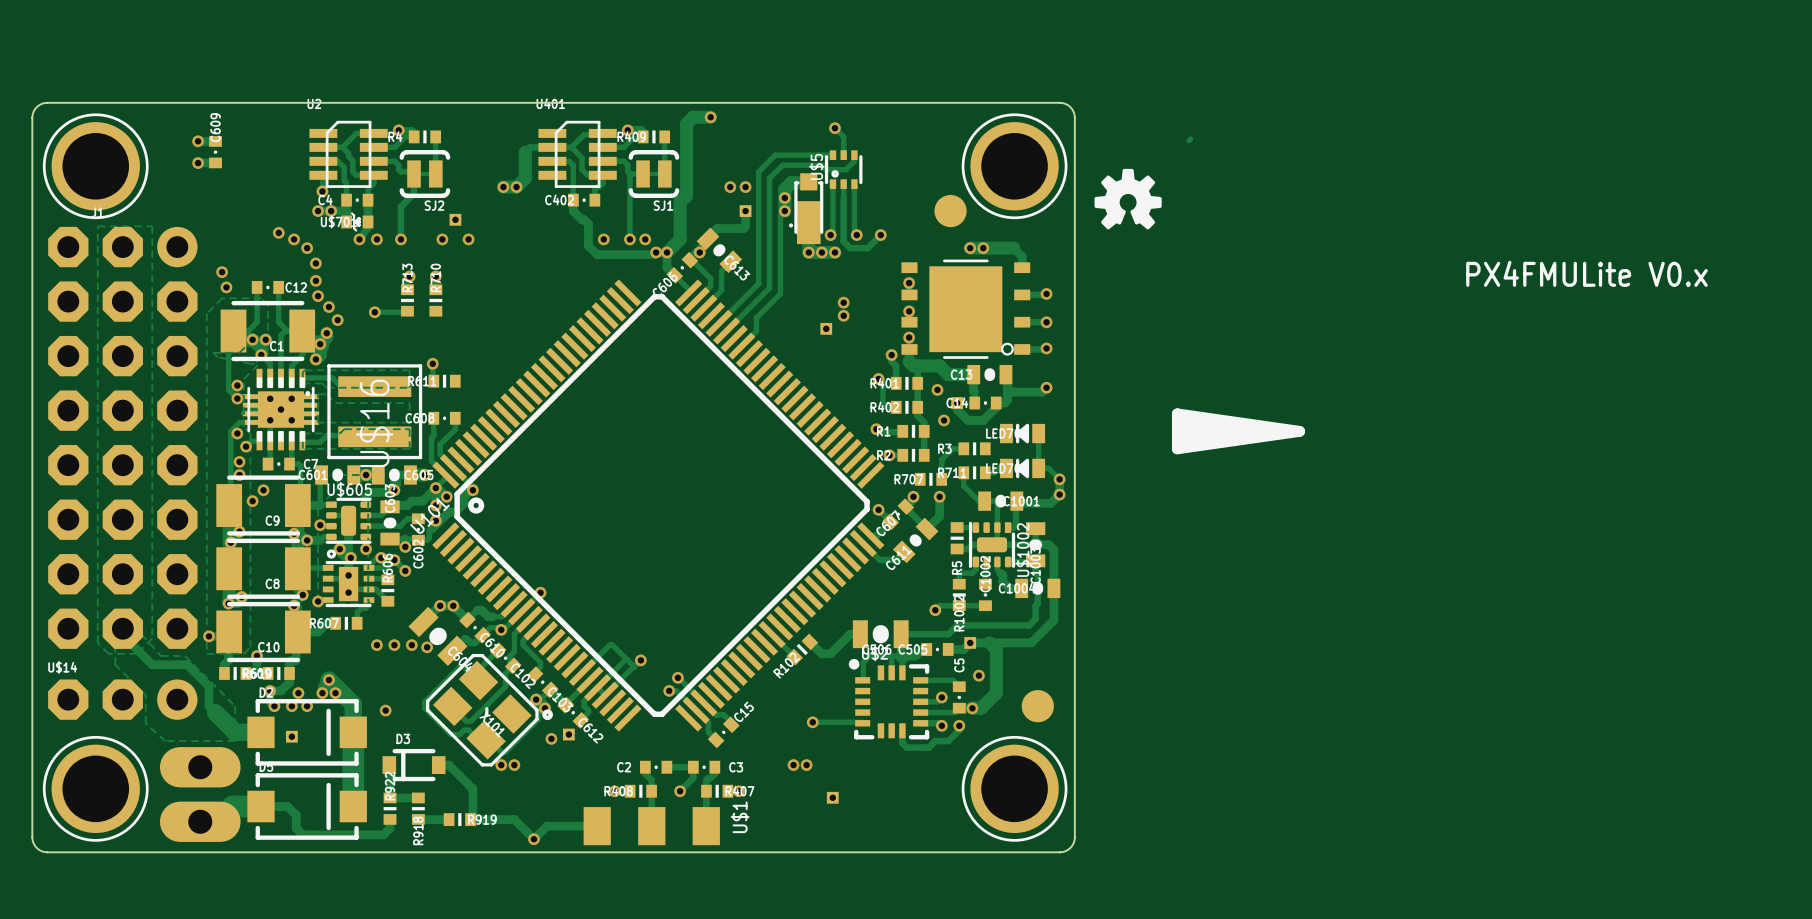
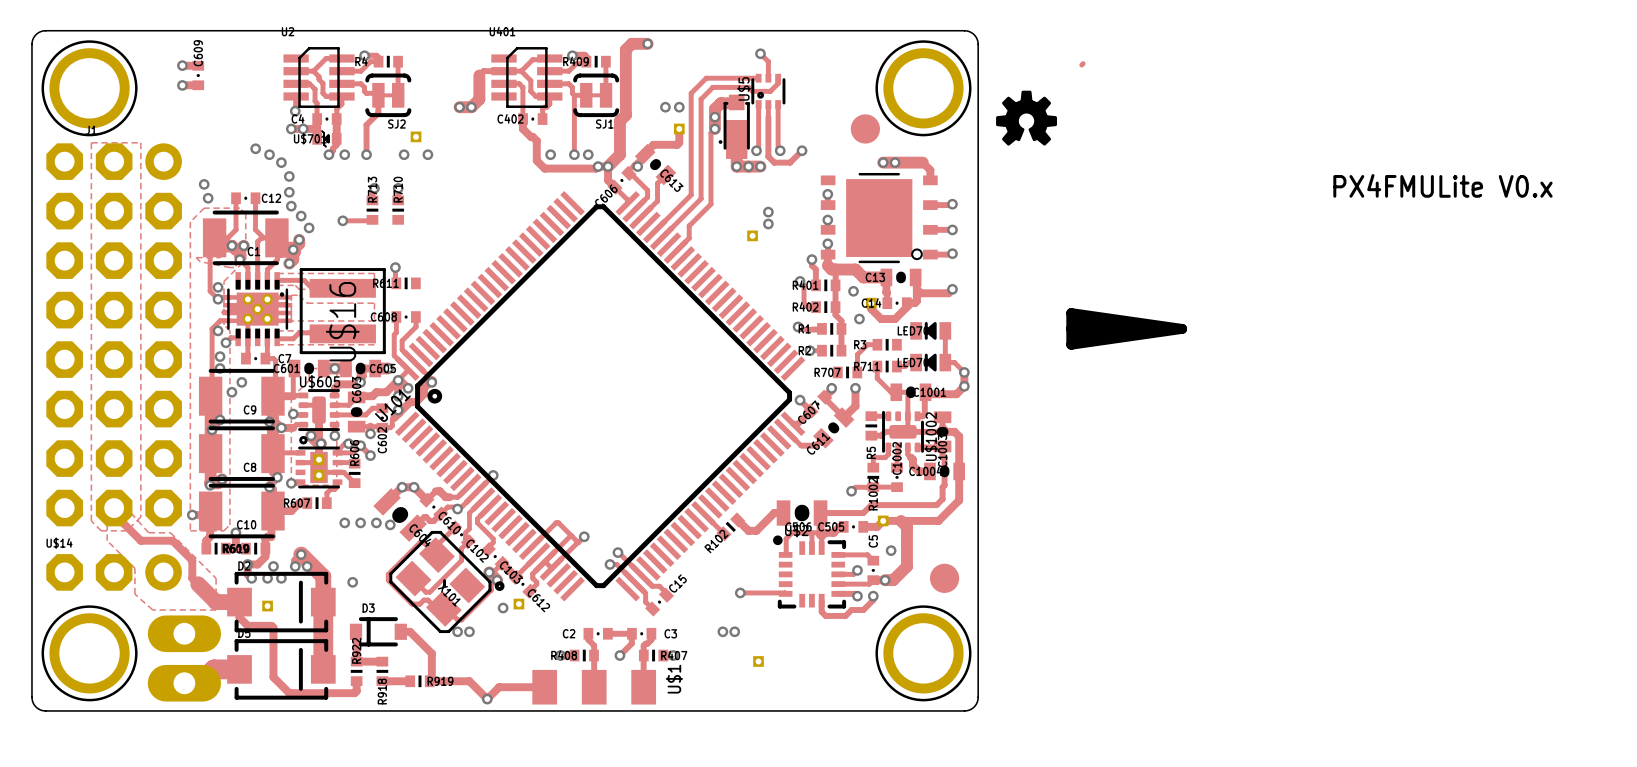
track: (260, 806) (287, 806) (296, 815) (296, 828) (302, 834) (383, 834) (390, 828) -> (239, 602) (239, 617) (247, 625) (271, 625) (273, 627) (273, 677) (289, 693) (354, 693) (356, 689)

